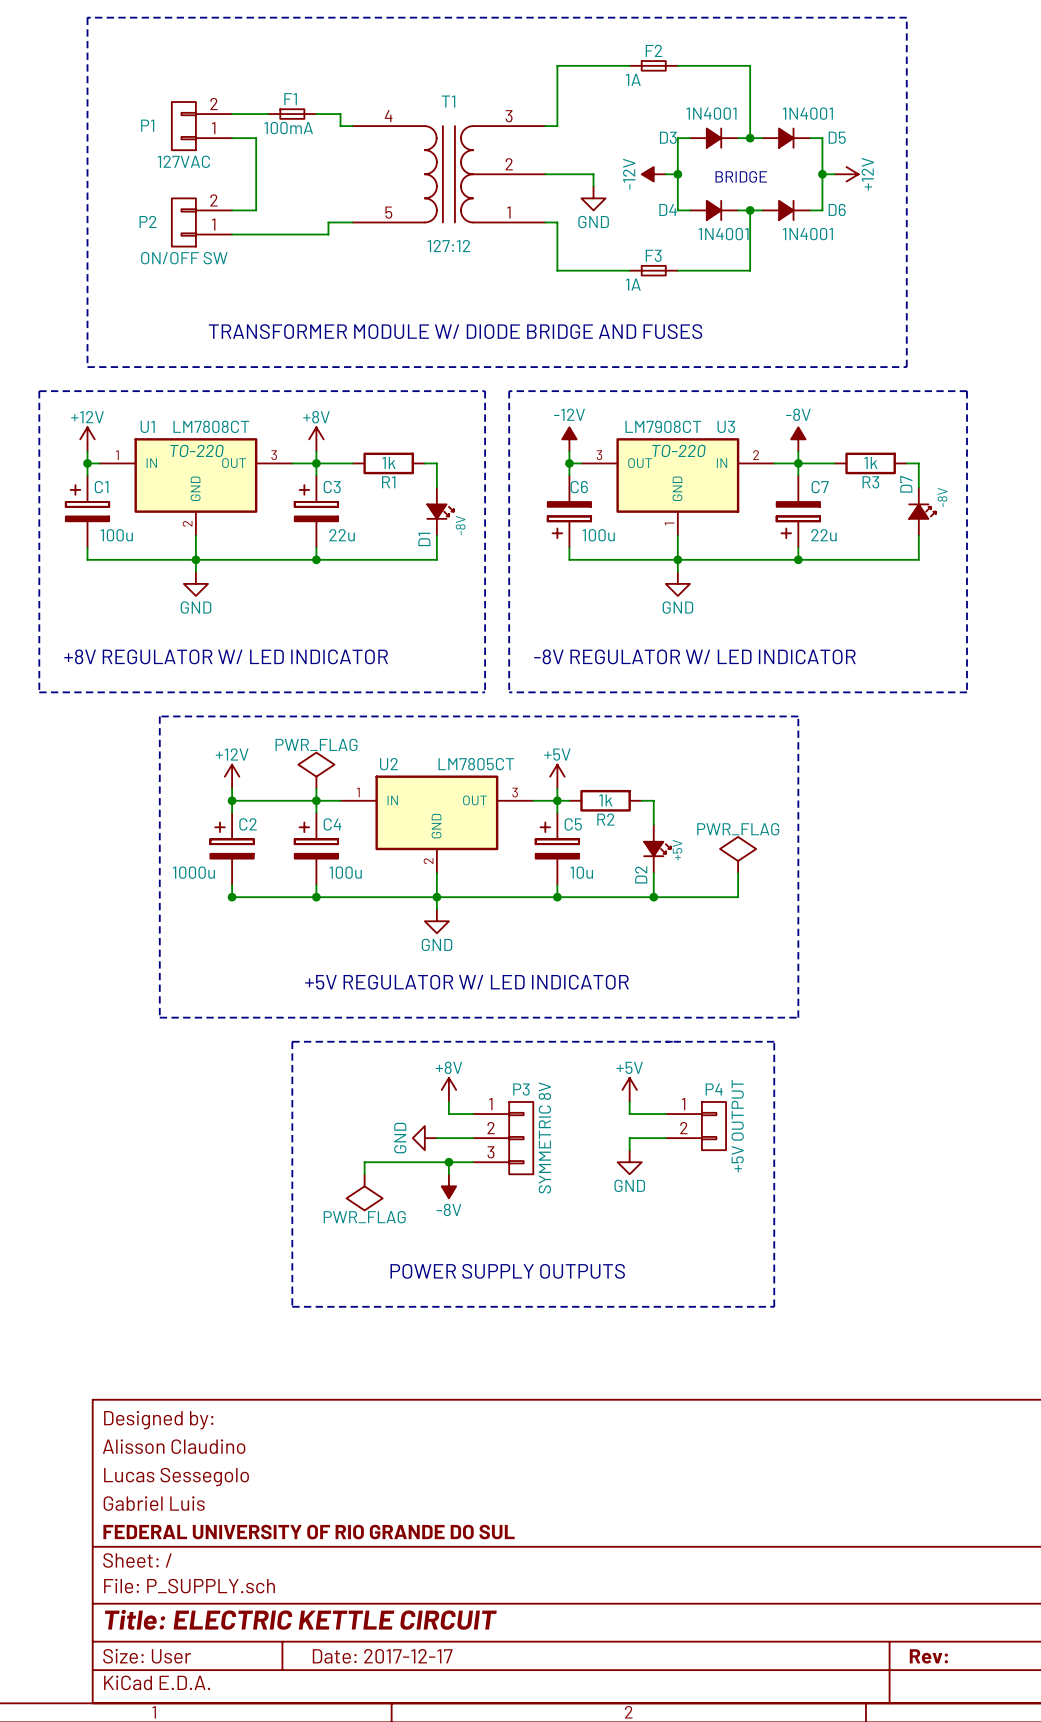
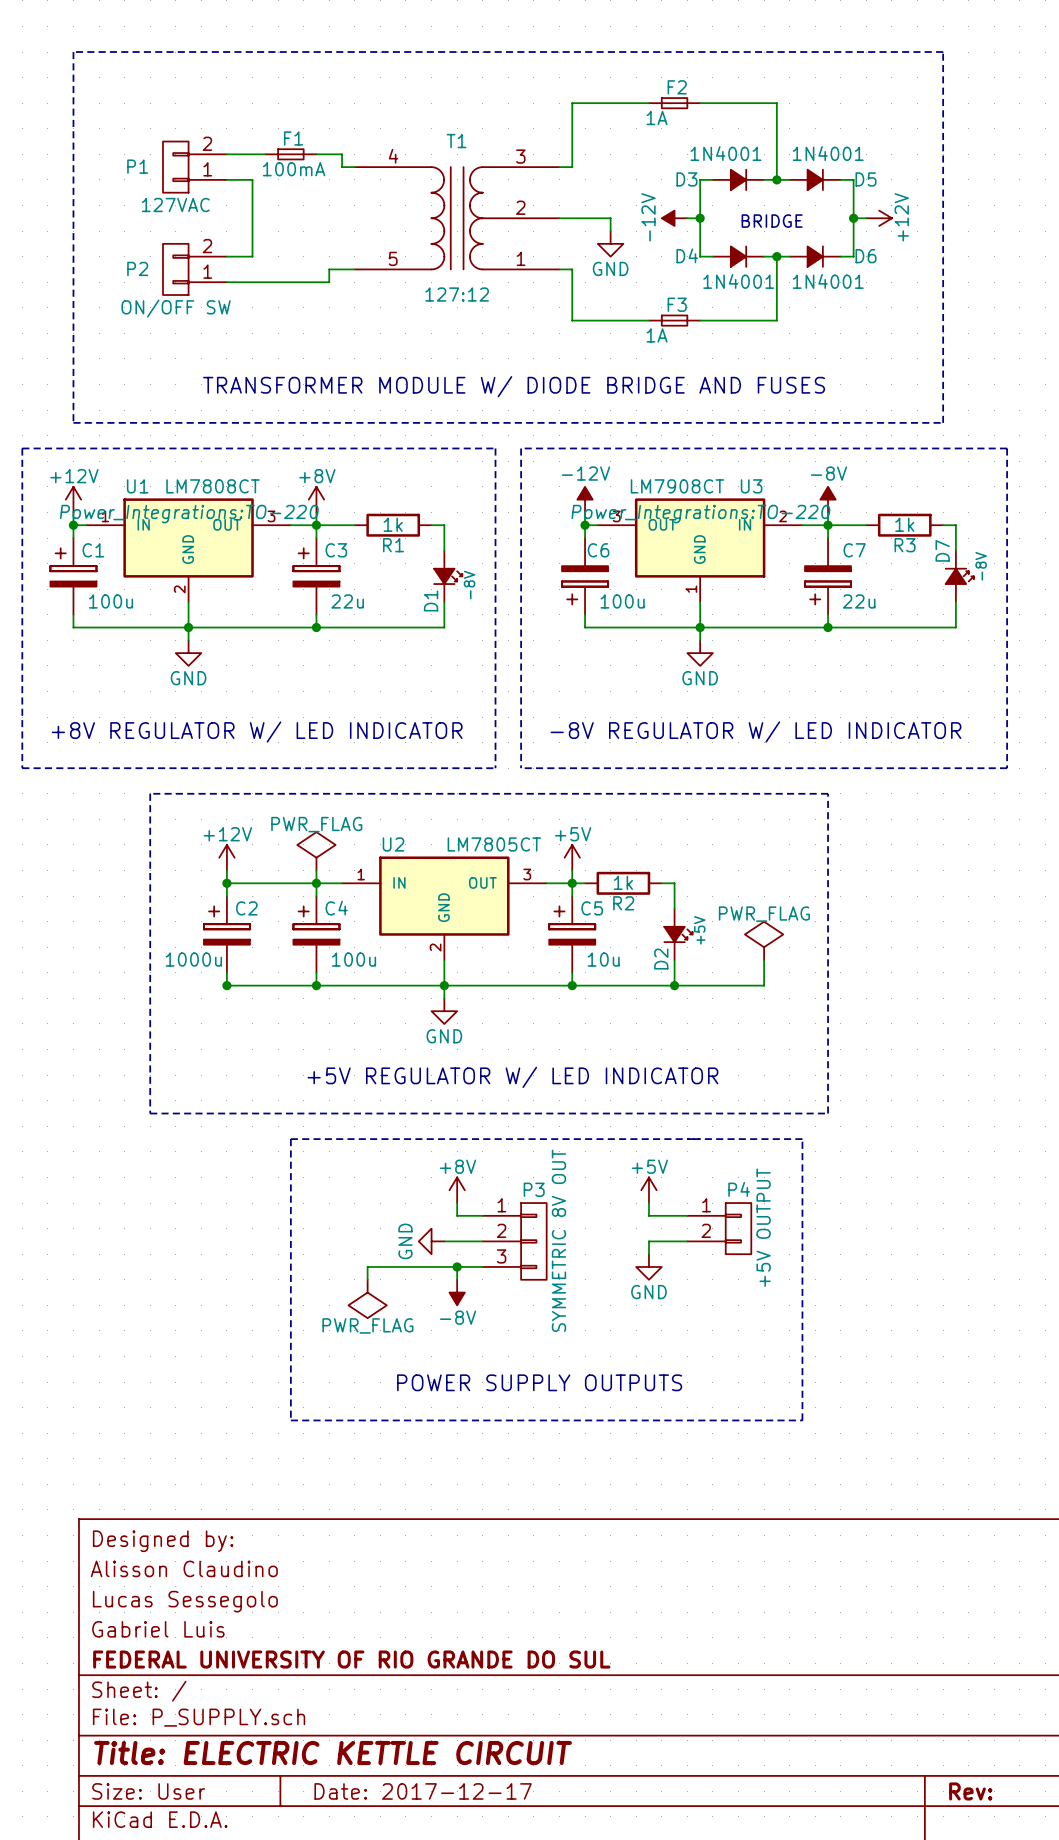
U1 text: TO-220 (197, 450) -> Power_Integrations:TO-220 (189, 514)
U3 text: TO-220 (678, 450) -> Power_Integrations:TO-220 (700, 514)
P3 value: SYMMETRIC 8V (544, 1137) -> SYMMETRIC 8V OUT (558, 1240)

